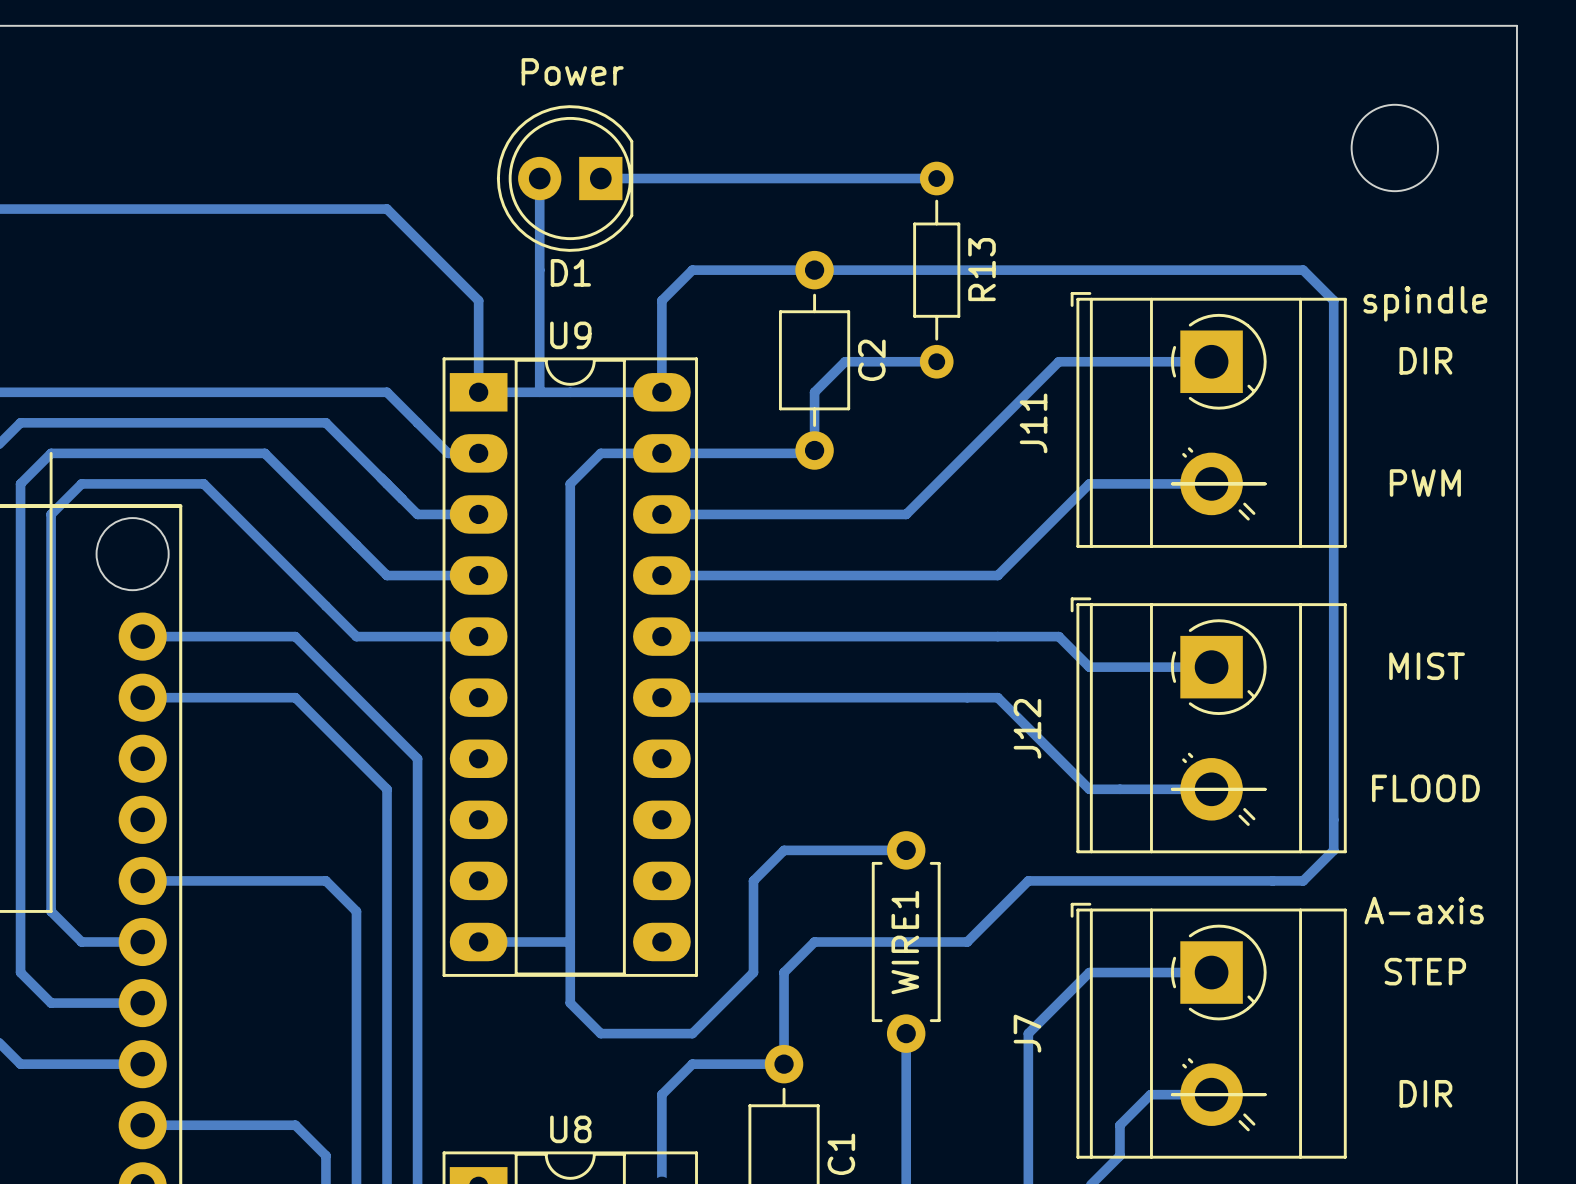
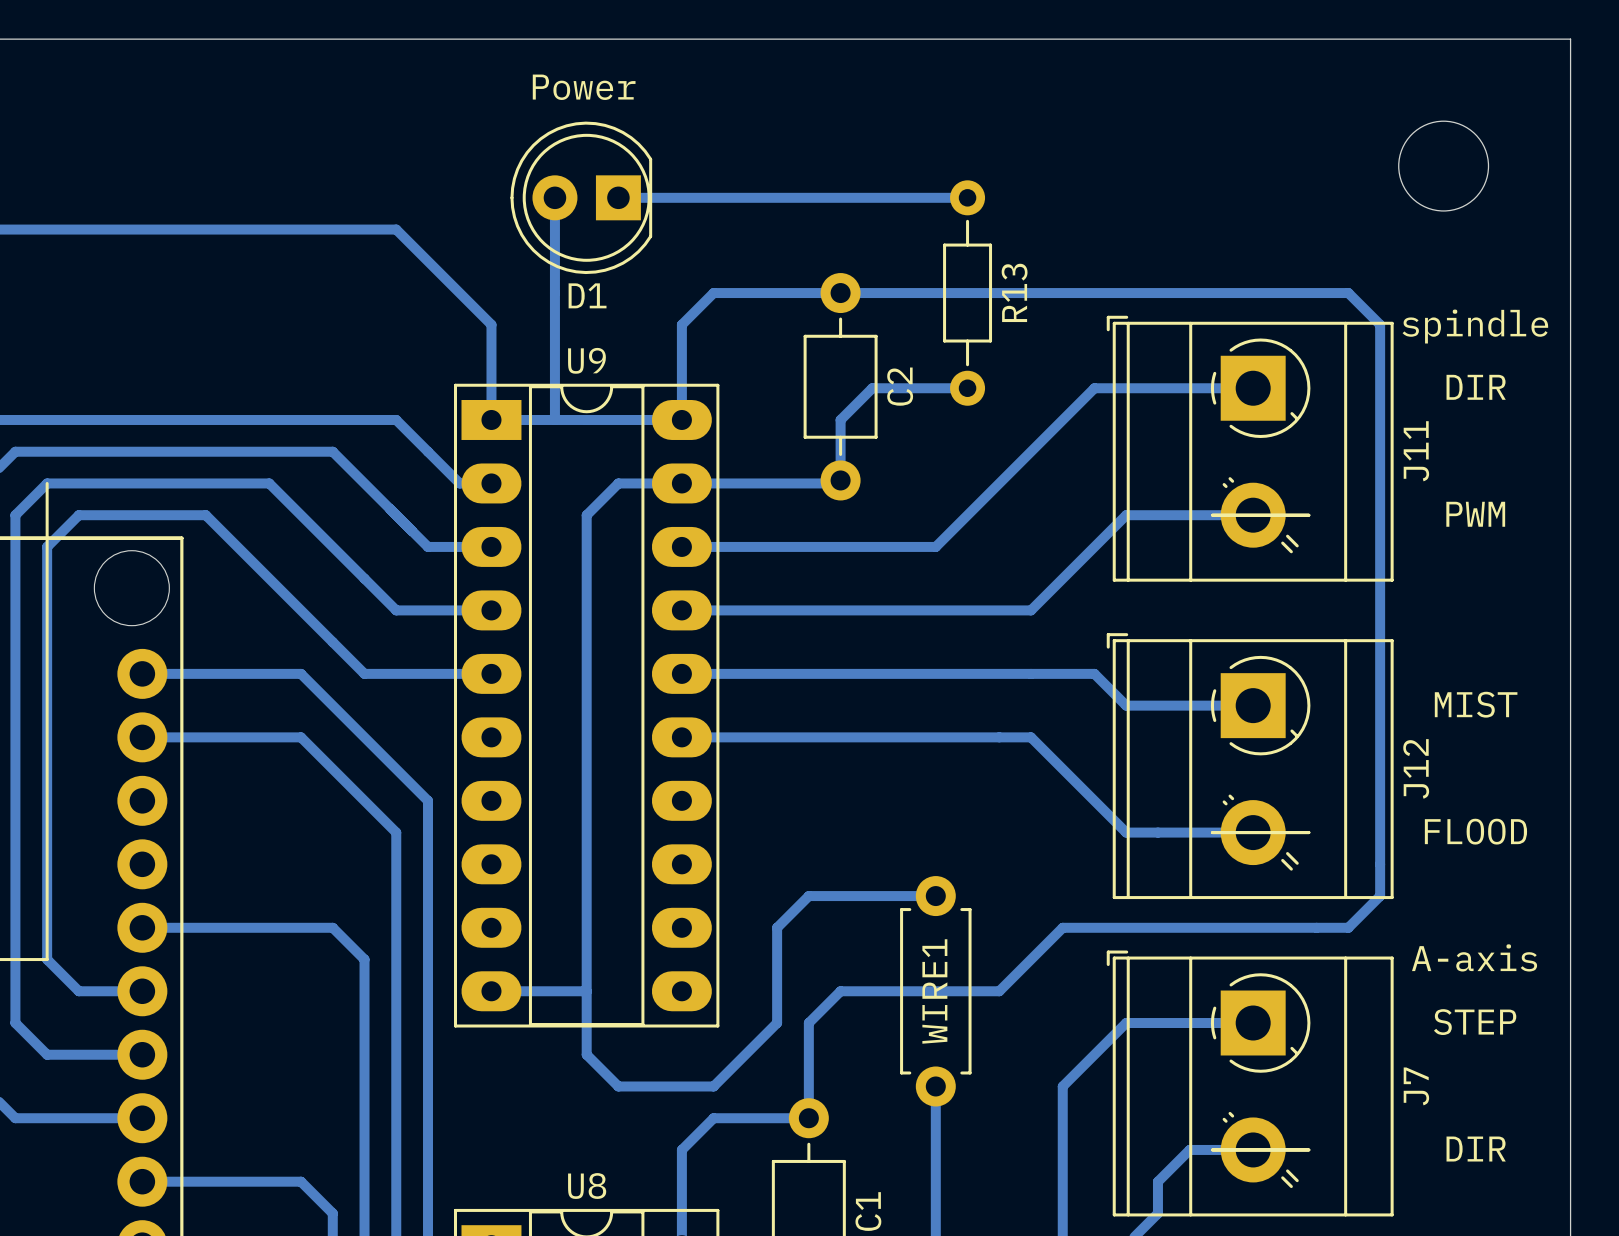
J11 name position: J11 (1033, 423) -> J11 (1416, 451)
J12 name position: J12 (1027, 728) -> J12 (1416, 768)
J7 name position: J7 (1027, 1033) -> J7 (1416, 1086)

